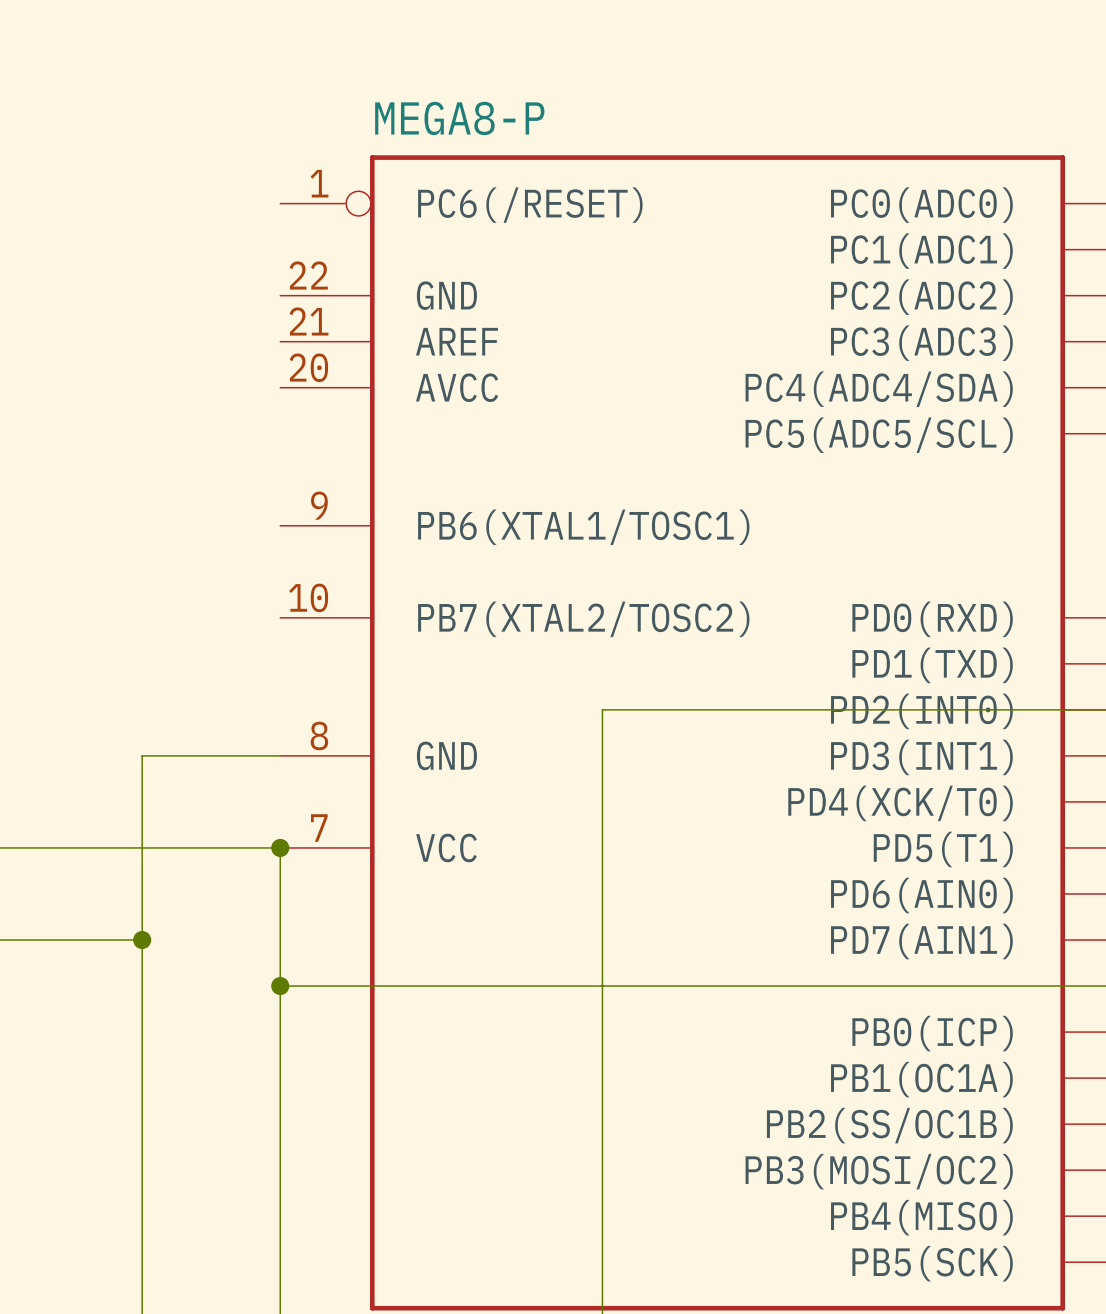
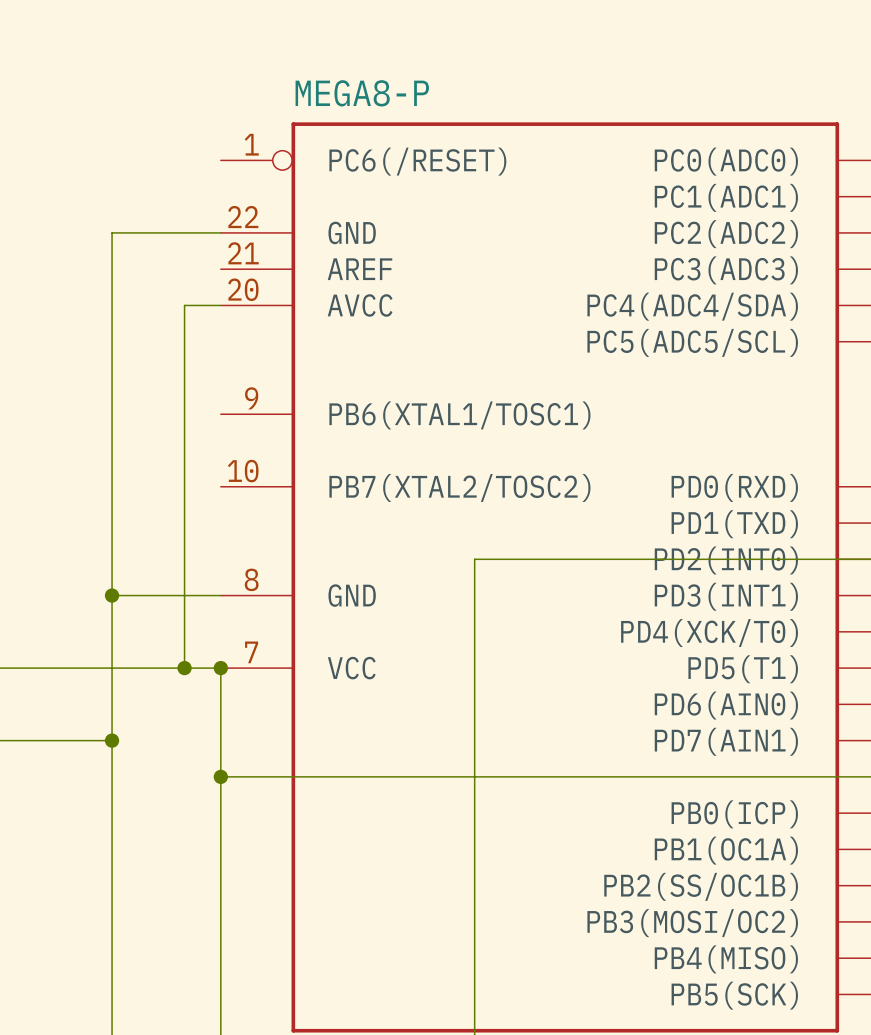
wire: none -> (220, 232) (112, 232) (112, 595)
wire: none -> (220, 305) (184, 305) (184, 668)
junction: none -> (112, 595)
junction: none -> (184, 668)

